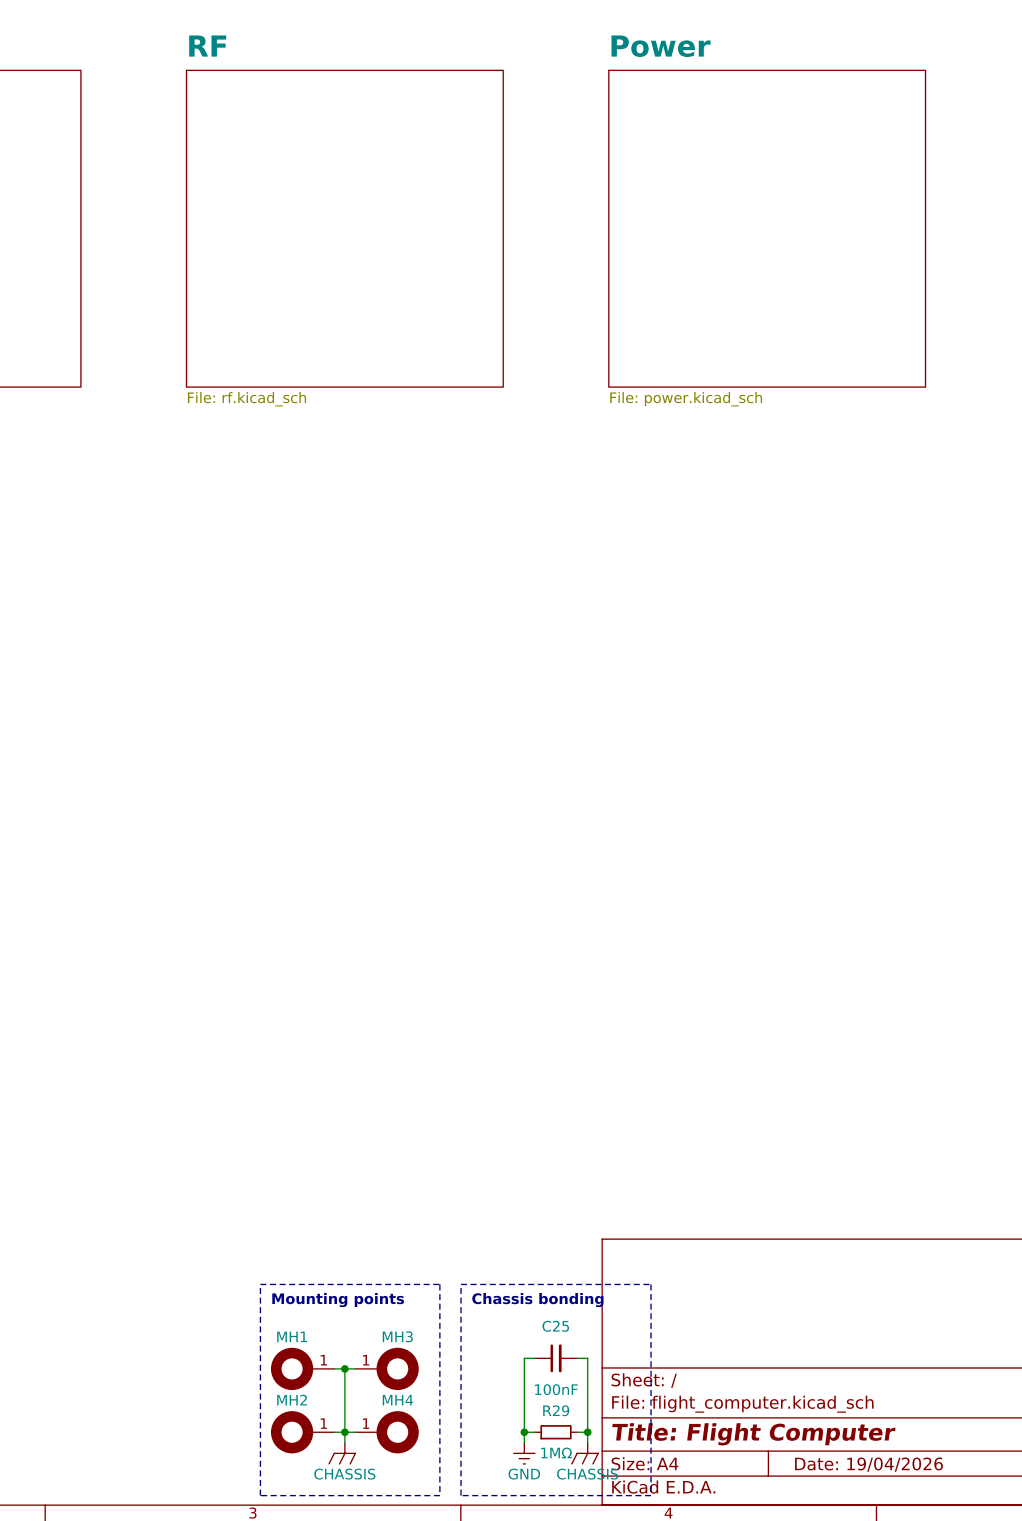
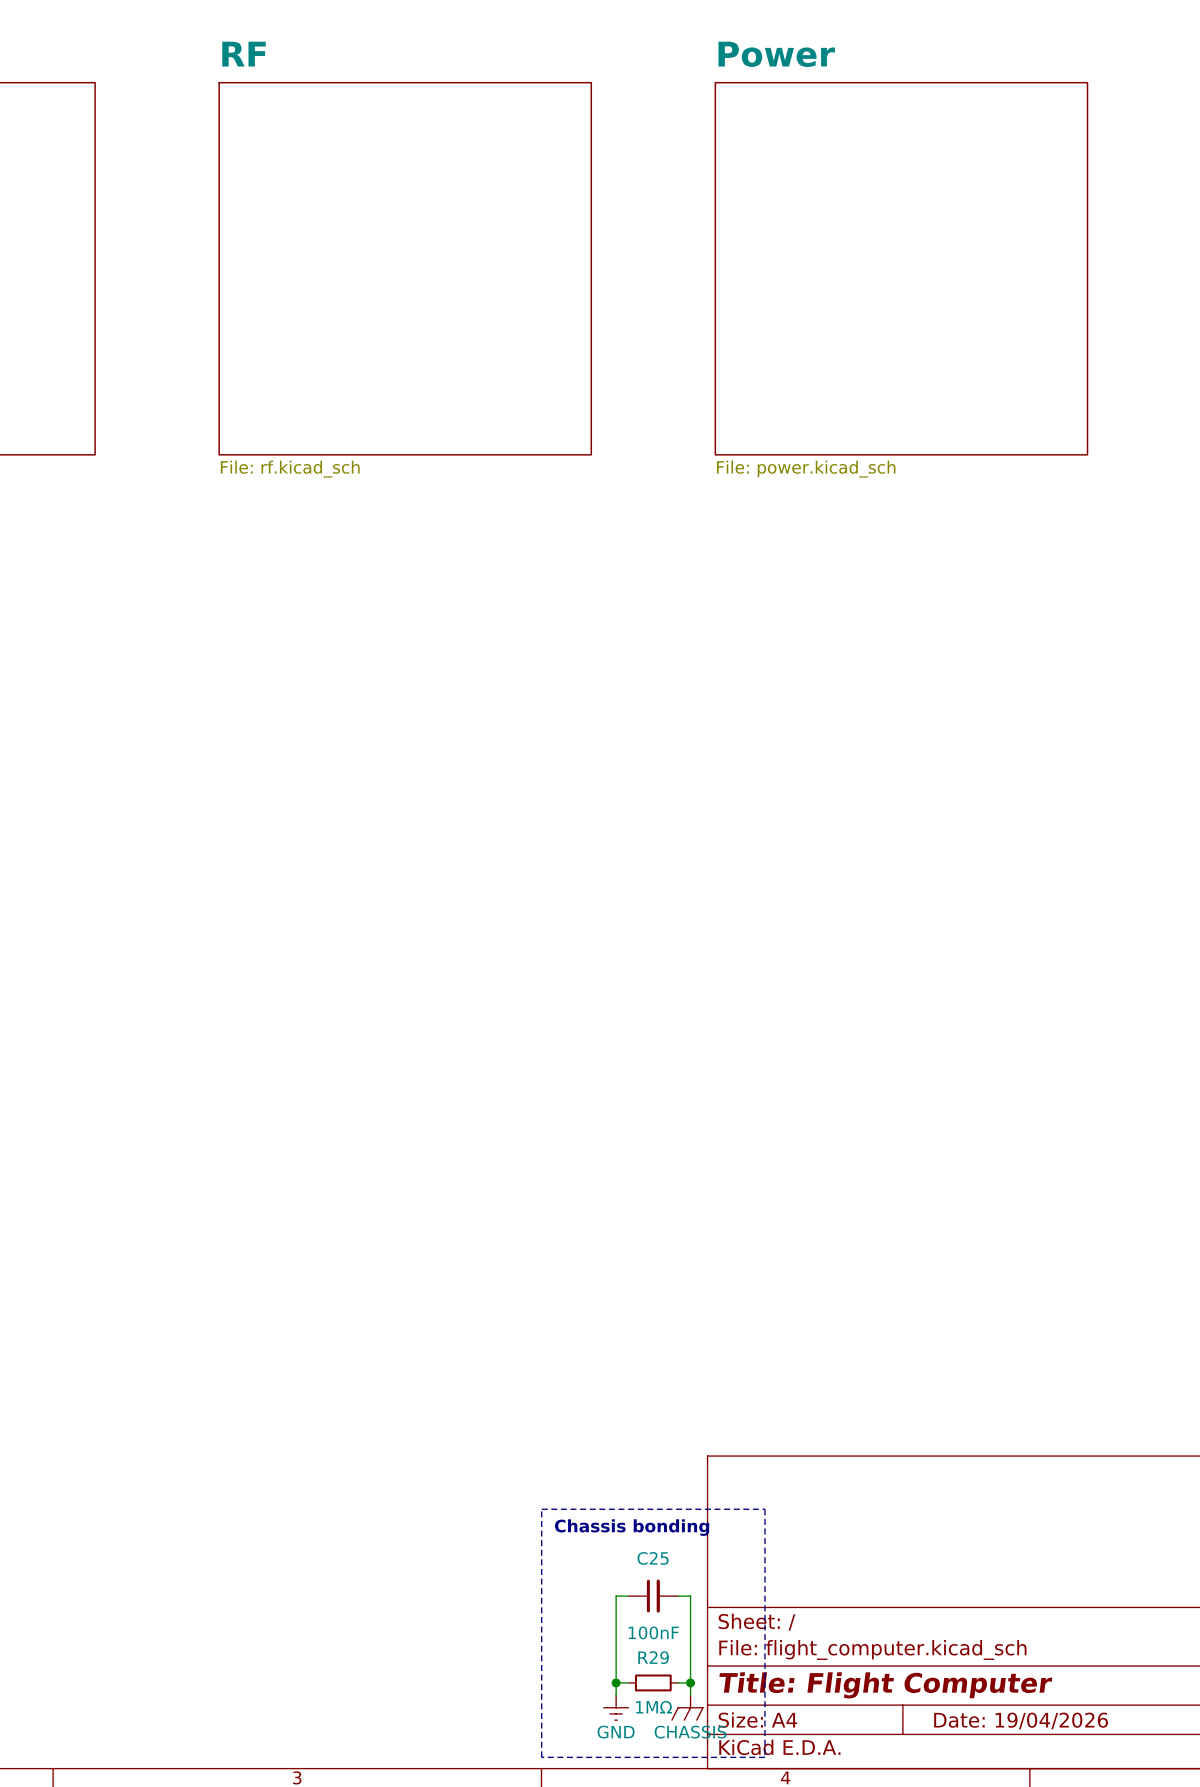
line: (260, 1284) (439, 1284) (439, 1495) (260, 1495) (260, 1284) -> none
text: Mounting points (338, 1300) -> none
MH1: (302, 1368) -> none
wire: (334, 1368) (355, 1368) -> none
wire: (344, 1368) (344, 1442) -> none
junction: (344, 1368) -> none
MH3: (387, 1368) -> none
MH2: (302, 1432) -> none
wire: (334, 1432) (355, 1432) -> none
junction: (344, 1432) -> none
MH4: (387, 1432) -> none
power symbol: CHASSIS (342, 1453) -> none

